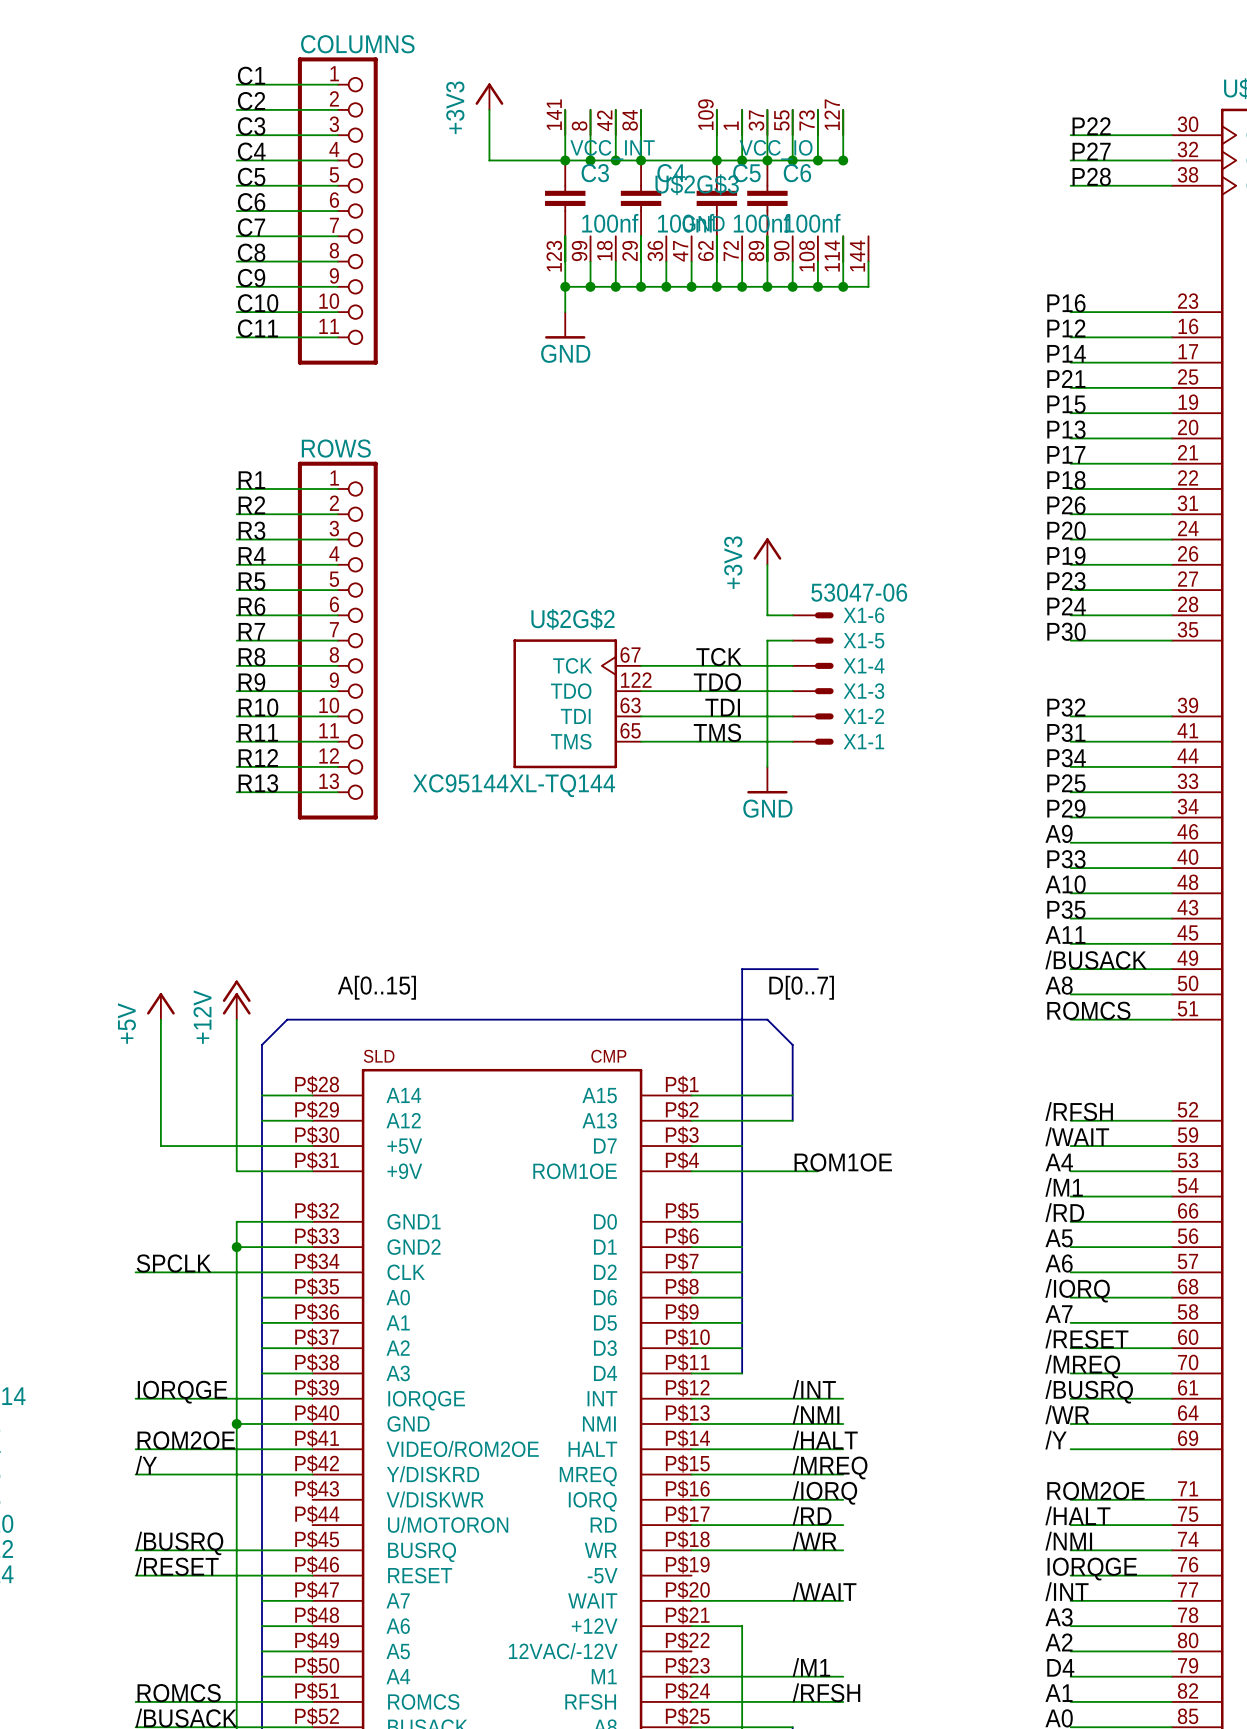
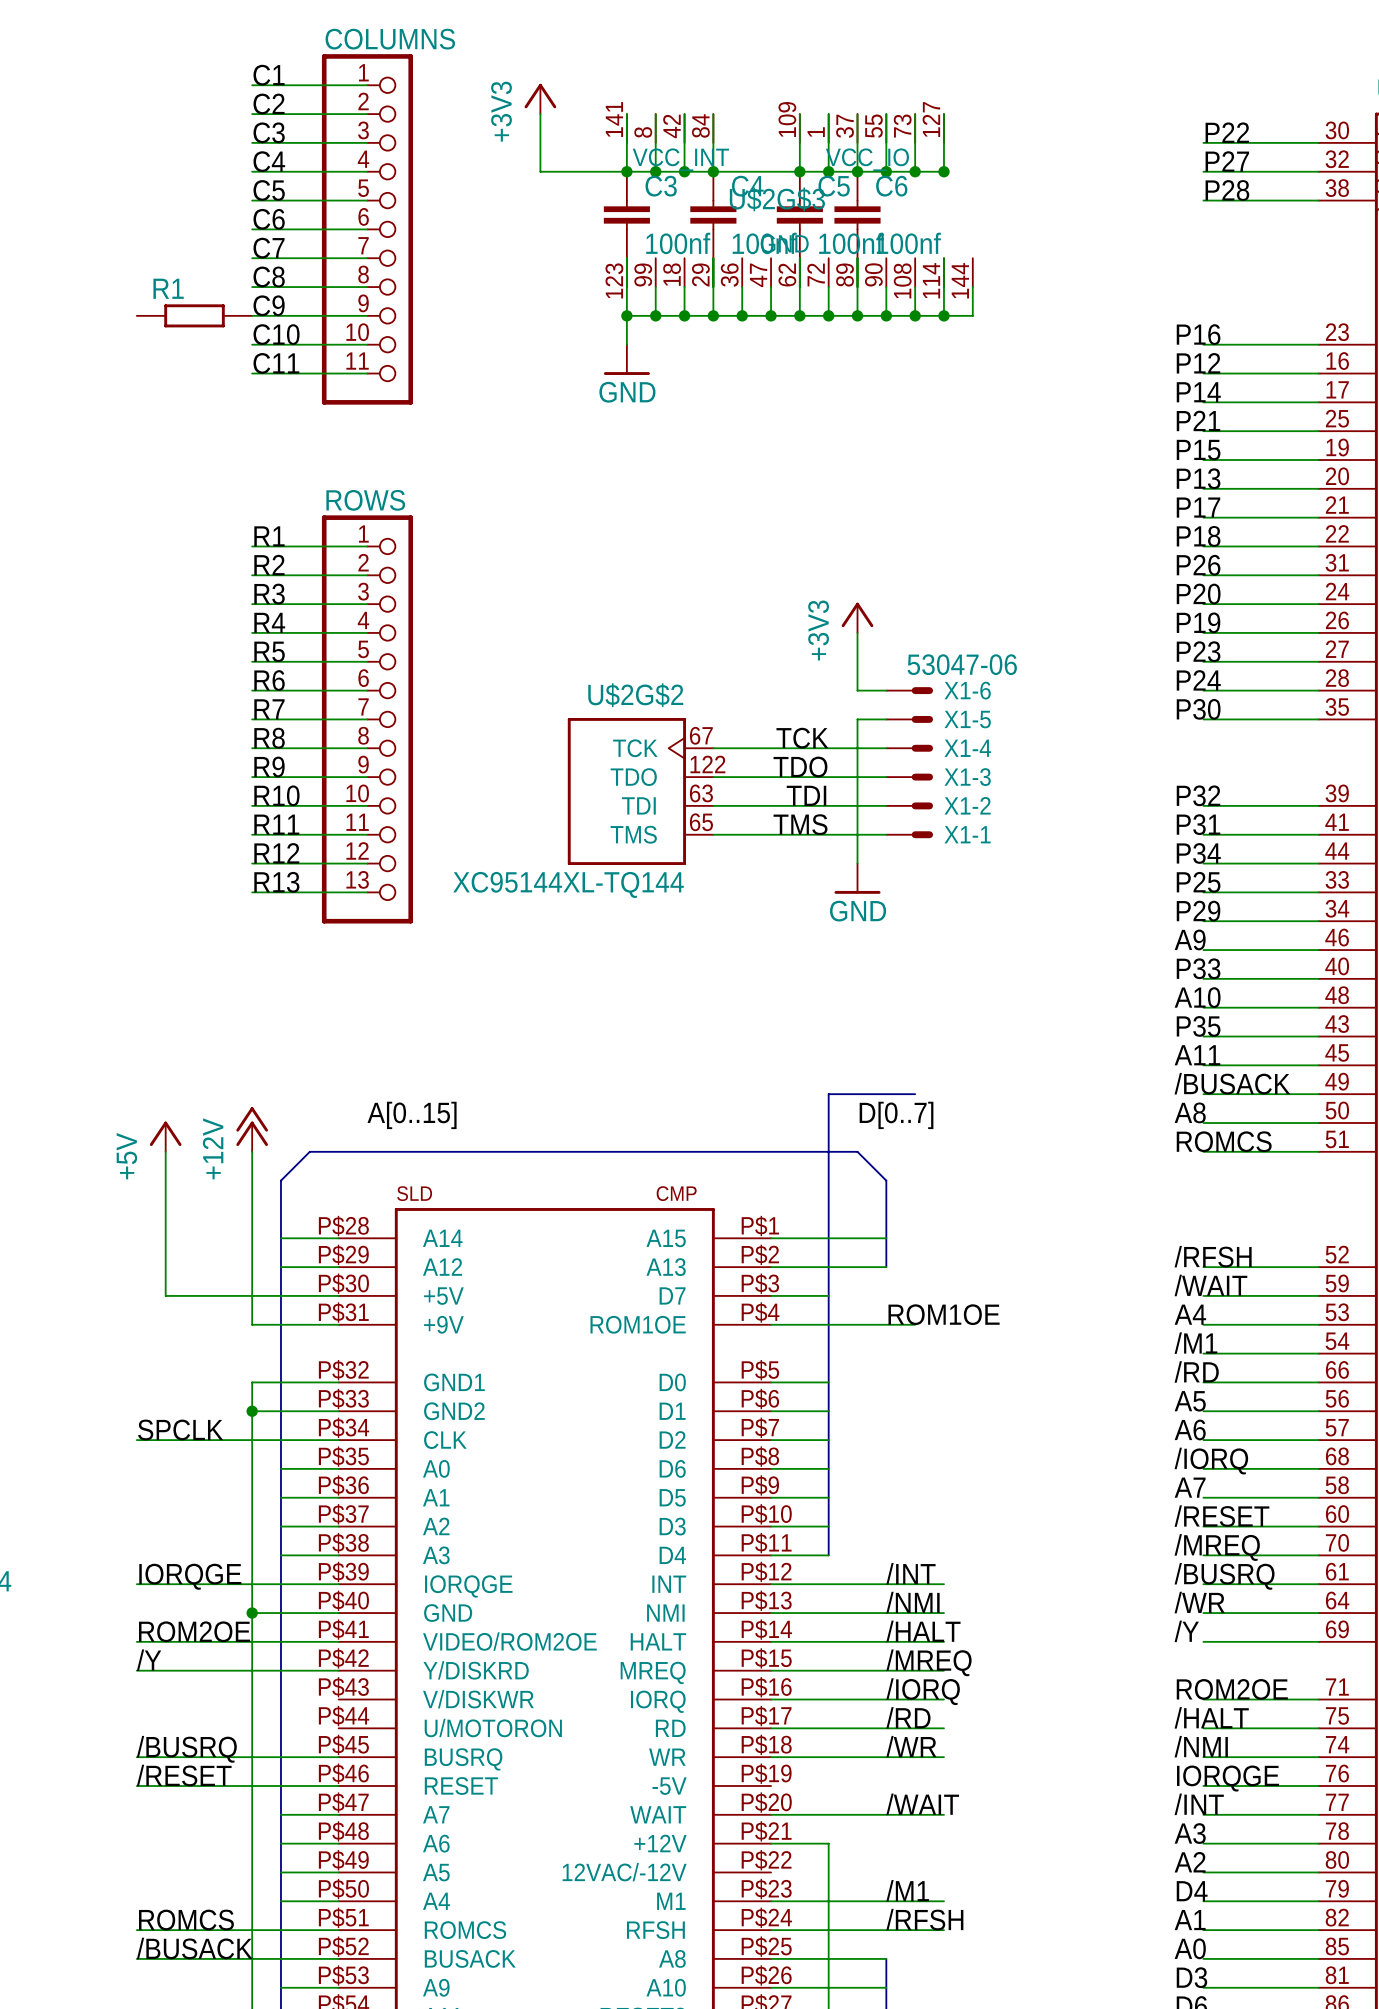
R1: none -> (194, 315)

